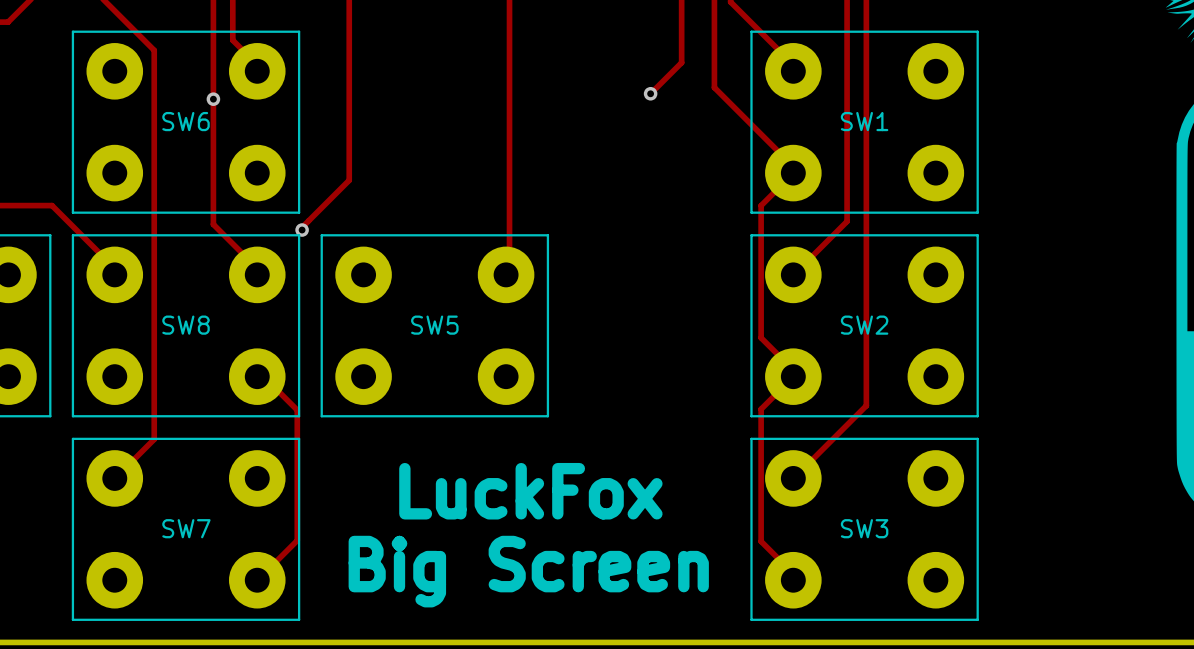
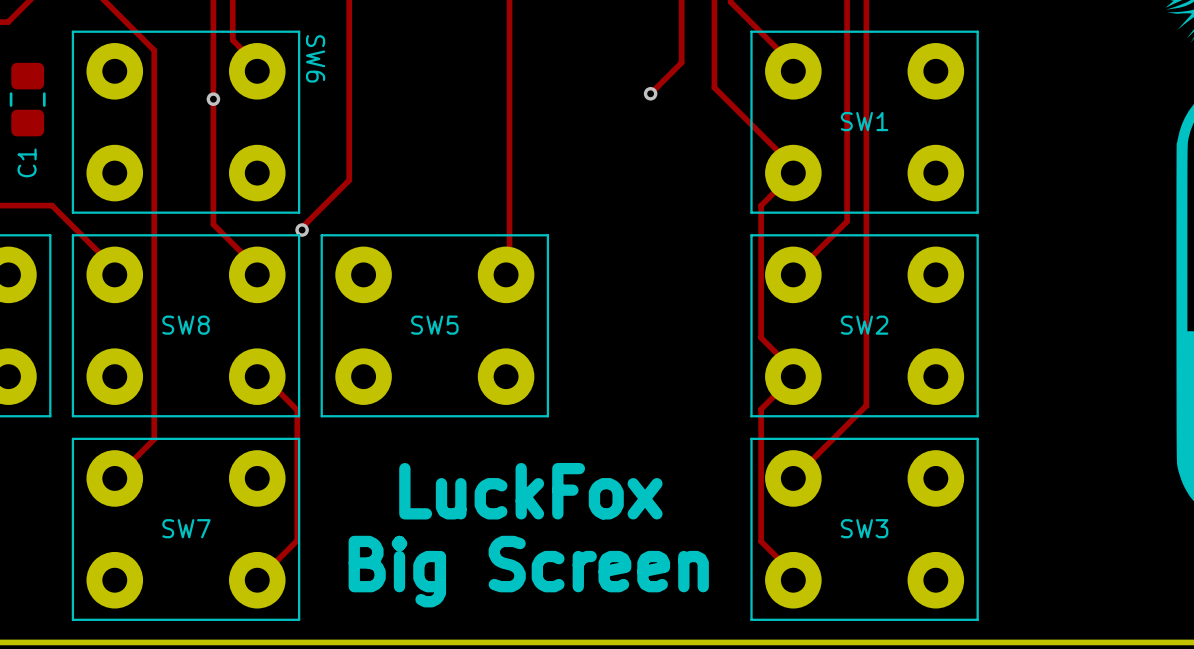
C1: none -> (27, 99)
SW6 name rotation: 0° (186, 121) -> 90° clockwise (315, 58)
SW6 name position: SW6 (186, 121) -> SW6 (315, 58)

